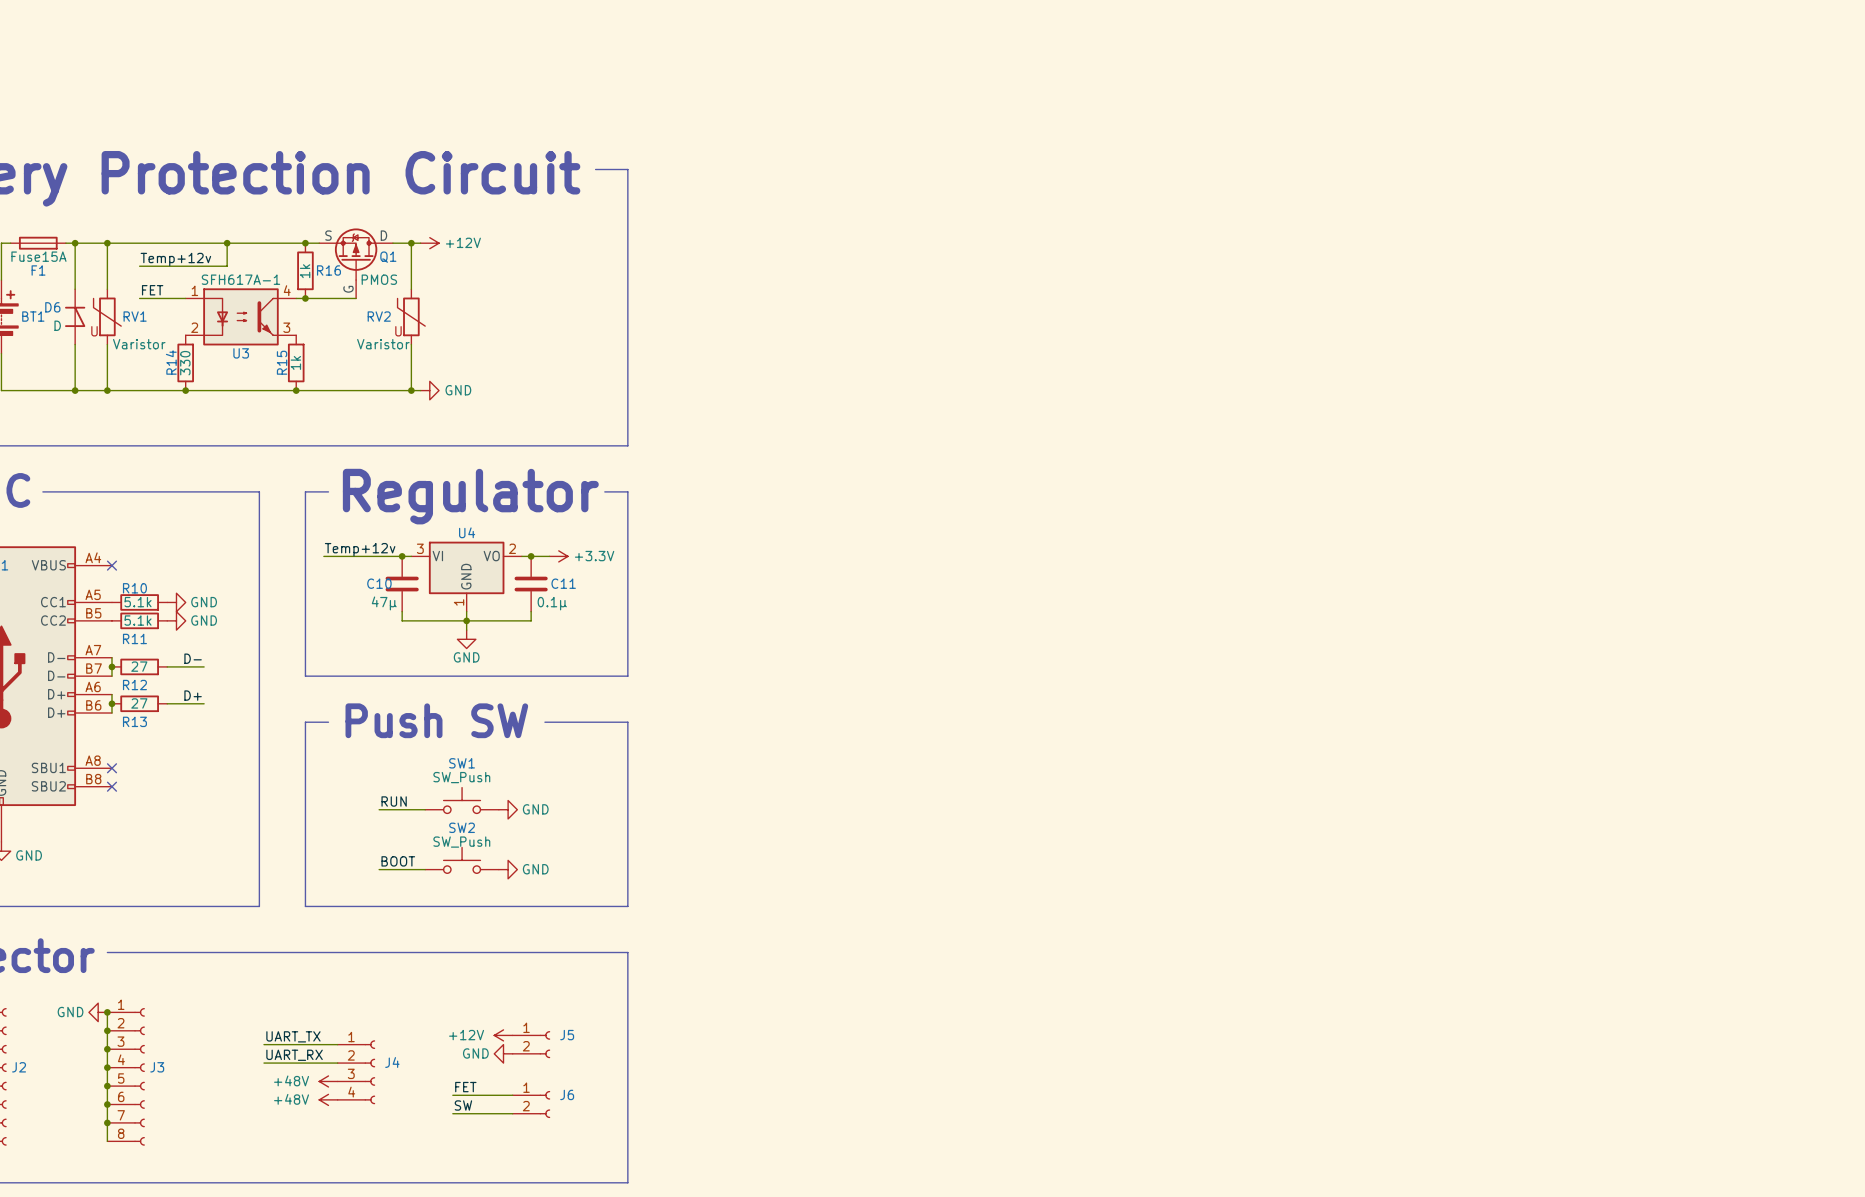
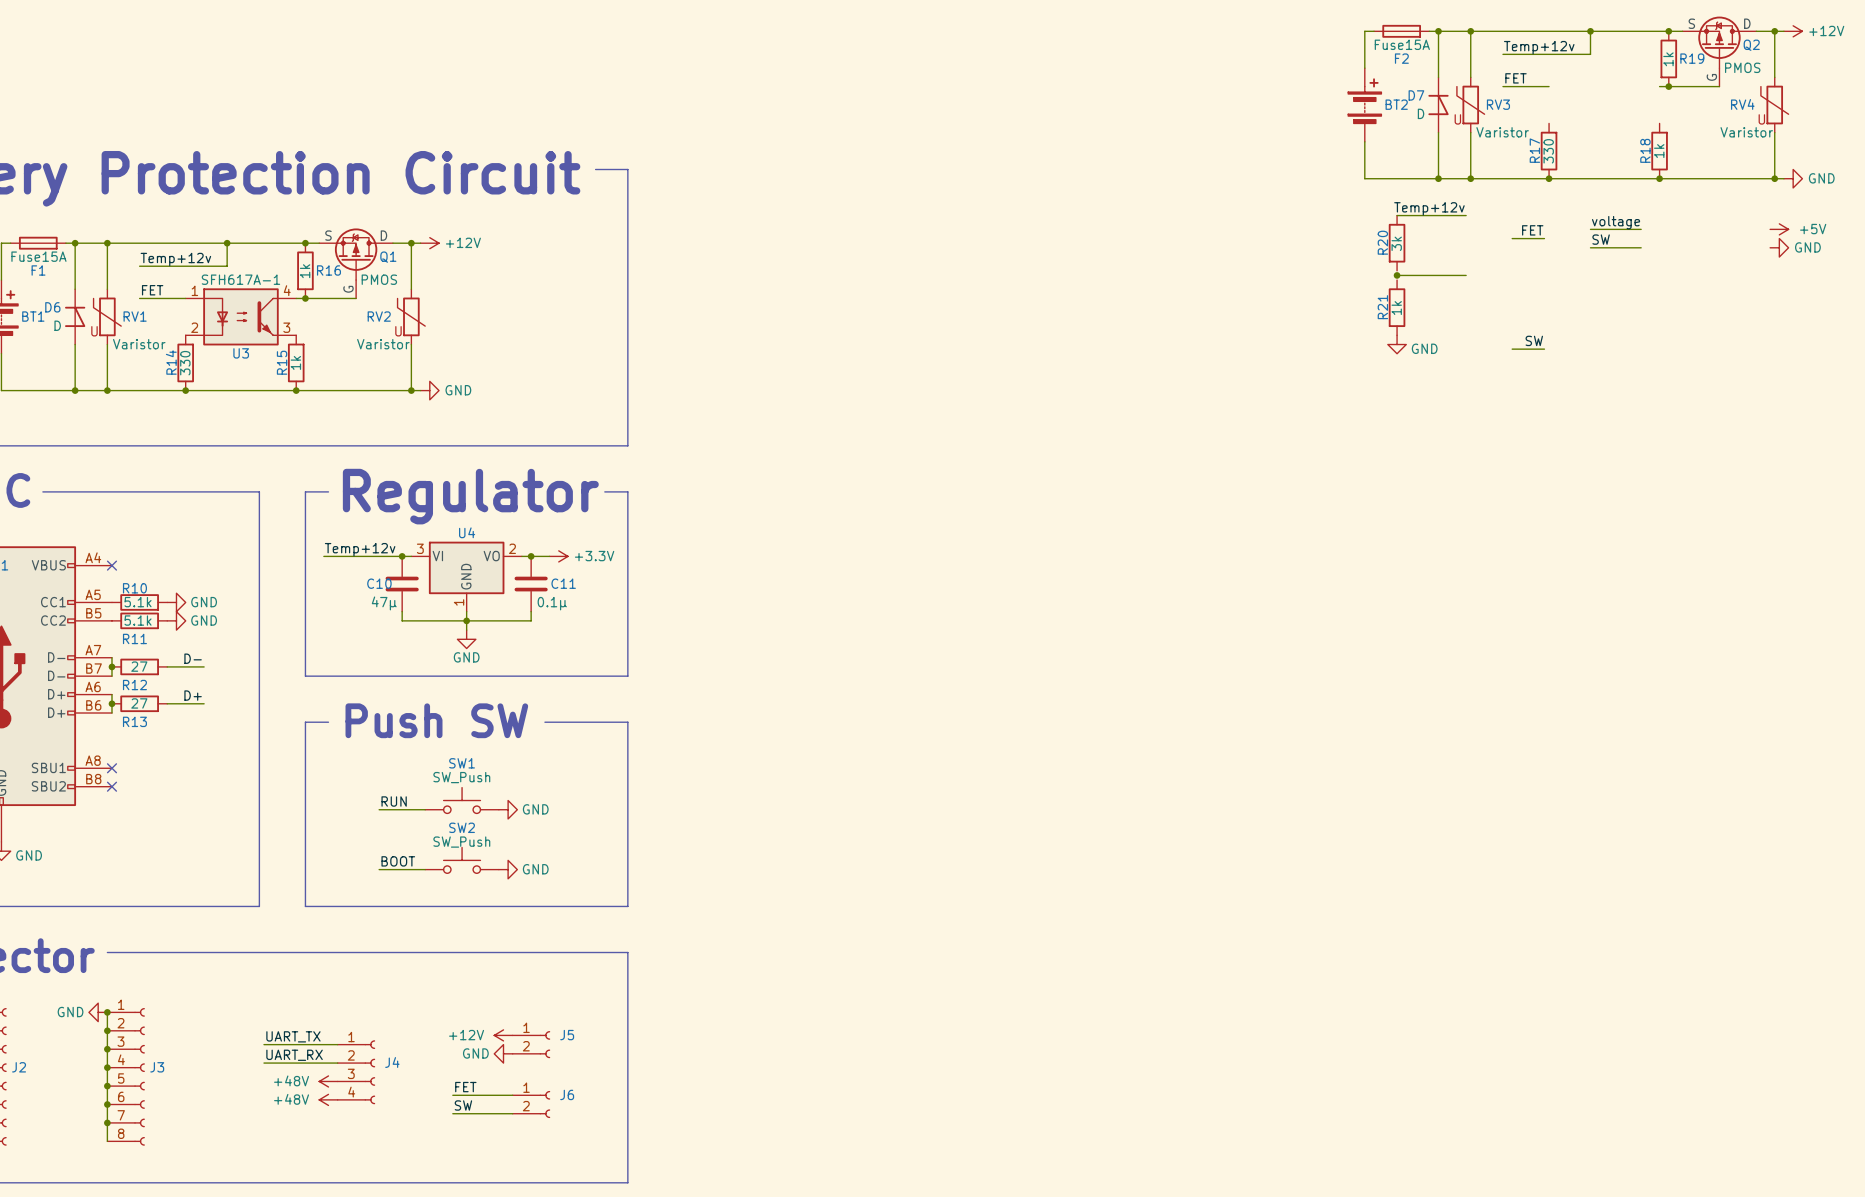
wire: none -> (1374, 31) (1364, 31) (1364, 68)
F2: none -> Fuse15A (1401, 31)
wire: none -> (1429, 31) (1682, 31)
wire: none -> (1438, 31) (1438, 77)
junction: none -> (1438, 31)
wire: none -> (1470, 31) (1470, 77)
junction: none -> (1470, 31)
wire: none -> (1590, 31) (1590, 54) (1502, 54)
junction: none -> (1590, 31)
junction: none -> (1668, 31)
wire: none -> (1756, 31) (1783, 31)
wire: none -> (1774, 31) (1774, 77)
junction: none -> (1774, 31)
power symbol: none -> +12V (1793, 31)
label: none -> Temp+12v (1539, 47)
Q2: none -> PMOS (1719, 51)
R19: none -> 1k (1668, 58)
label: none -> FET (1515, 78)
wire: none -> (1502, 86) (1549, 86)
wire: none -> (1659, 86) (1719, 86)
junction: none -> (1668, 86)
BT2: none -> (1364, 105)
D7: none -> D (1438, 105)
RV3: none -> Varistor (1470, 105)
RV4: none -> Varistor (1774, 105)
wire: none -> (1438, 132) (1438, 178)
wire: none -> (1470, 132) (1470, 178)
wire: none -> (1774, 132) (1774, 178)
wire: none -> (1364, 141) (1364, 178) (1783, 178)
R17: none -> 330 (1549, 151)
R18: none -> 1k (1659, 151)
junction: none -> (1438, 178)
junction: none -> (1470, 178)
junction: none -> (1549, 178)
junction: none -> (1659, 178)
junction: none -> (1774, 178)
power symbol: none -> GND (1793, 178)
label: none -> Temp+12v (1429, 208)
wire: none -> (1397, 215) (1466, 215)
label: none -> voltage (1616, 222)
wire: none -> (1590, 229) (1641, 229)
power symbol: none -> +5V (1779, 229)
label: none -> FET (1532, 230)
wire: none -> (1512, 238) (1544, 238)
label: none -> SW (1601, 239)
R20: none -> 3k (1397, 243)
wire: none -> (1590, 247) (1641, 247)
power symbol: none -> GND (1779, 247)
wire: none -> (1397, 275) (1466, 275)
junction: none -> (1397, 275)
R21: none -> 1k (1397, 307)
label: none -> SW (1534, 340)
power symbol: none -> GND (1397, 344)
wire: none -> (1512, 349) (1544, 349)

